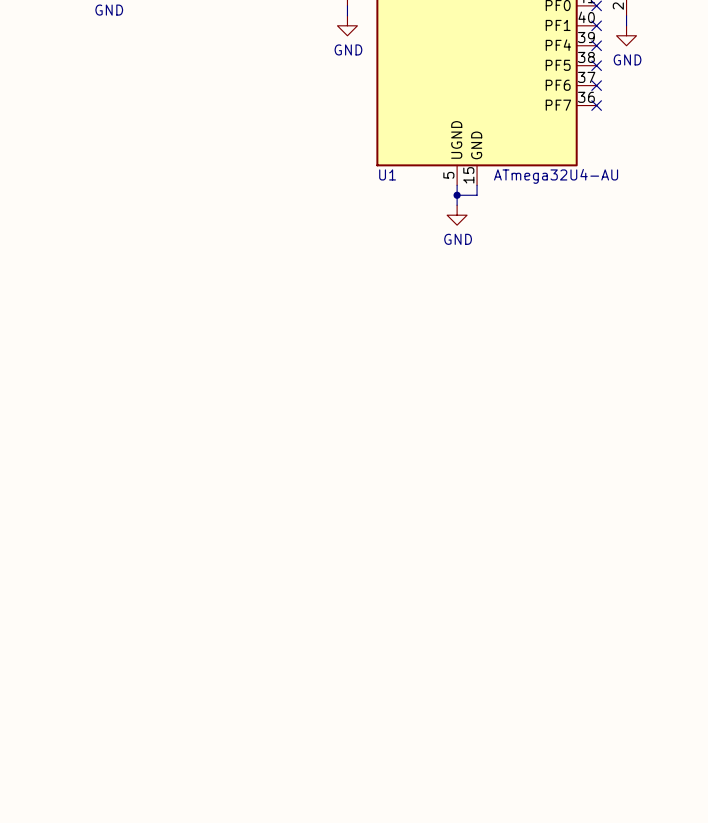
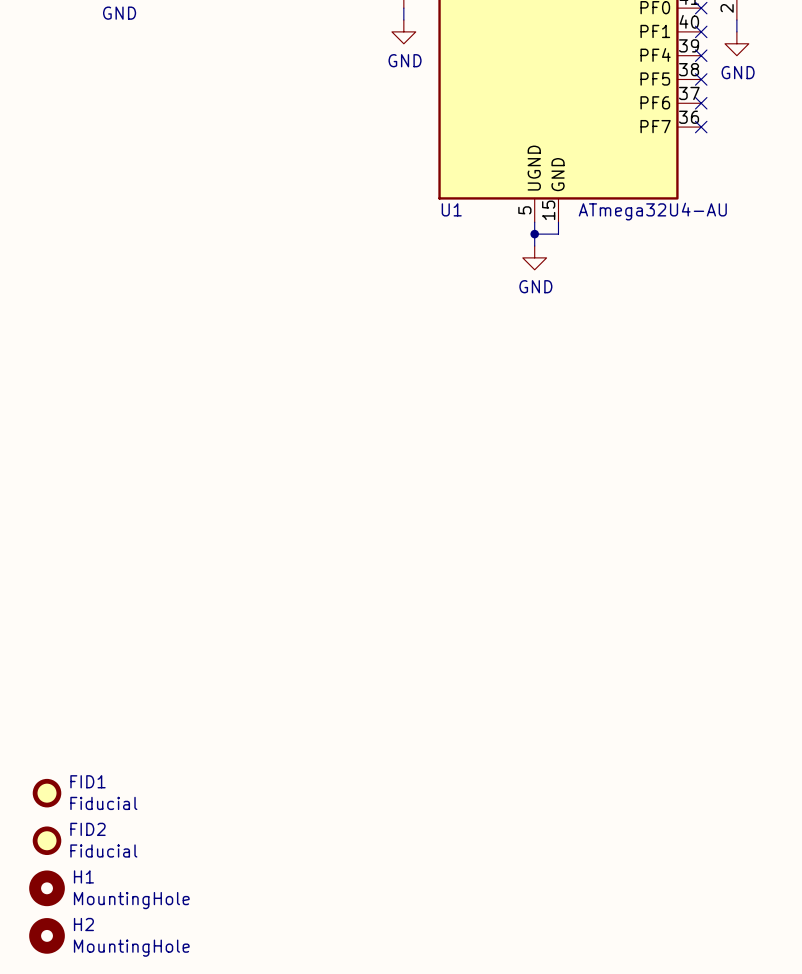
FID1: none -> Fiducial (47, 793)
FID2: none -> Fiducial (47, 840)
H1: none -> MountingHole (47, 888)
H2: none -> MountingHole (47, 935)

